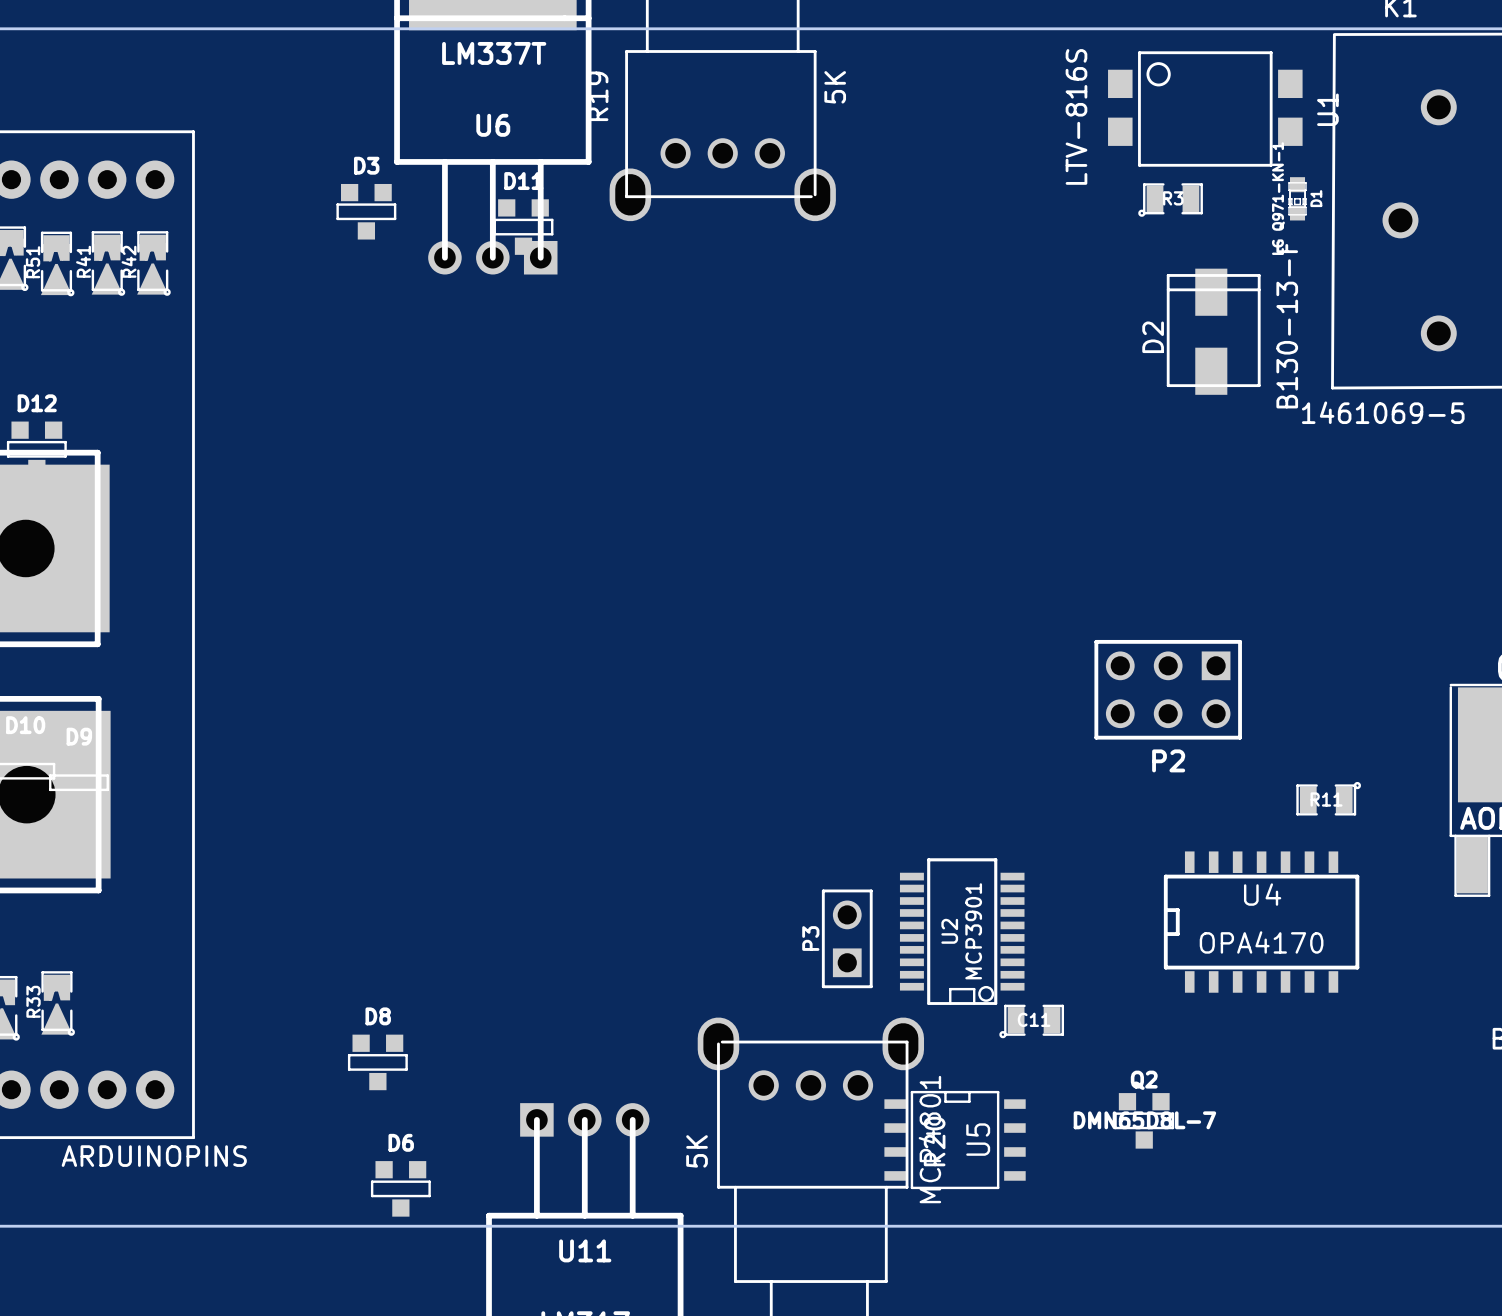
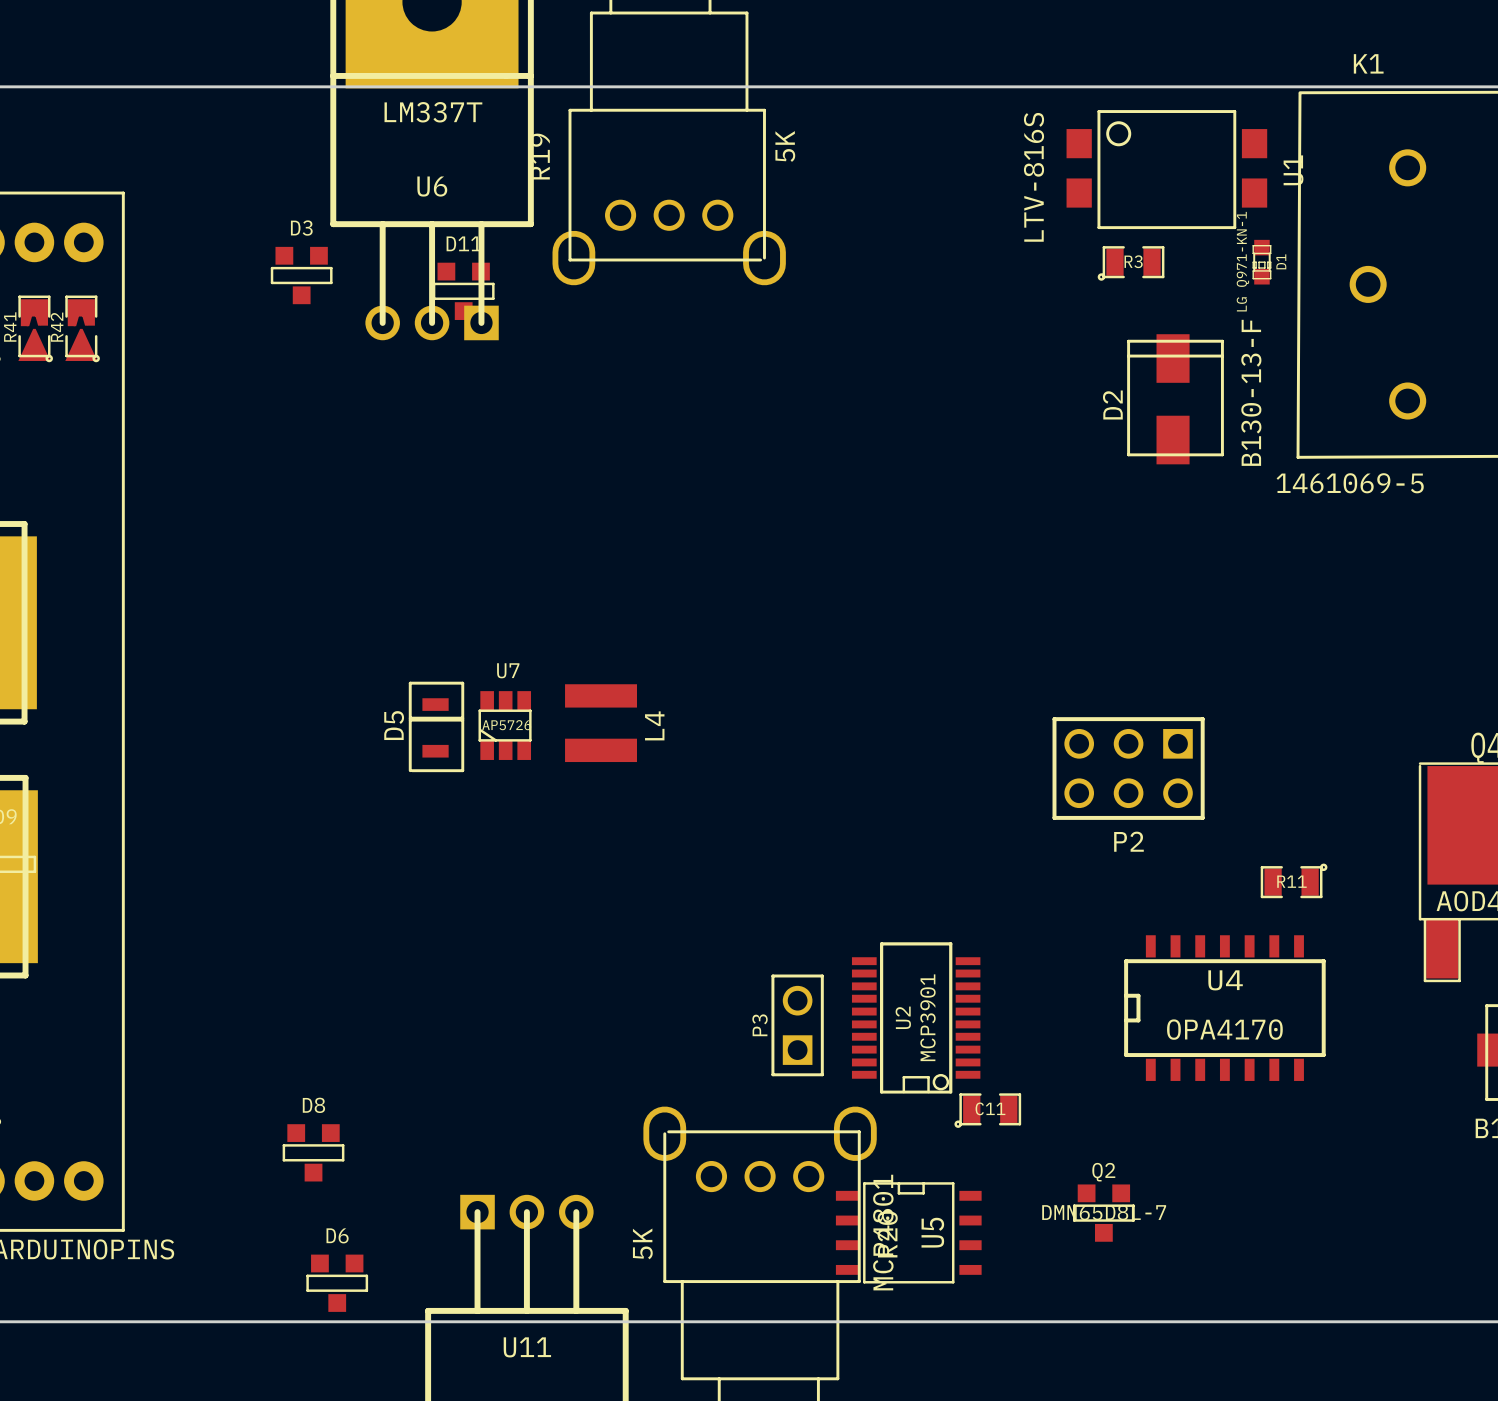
L4: none -> (601, 723)
U7: none -> AP5726 (505, 725)
D5: none -> (436, 726)

